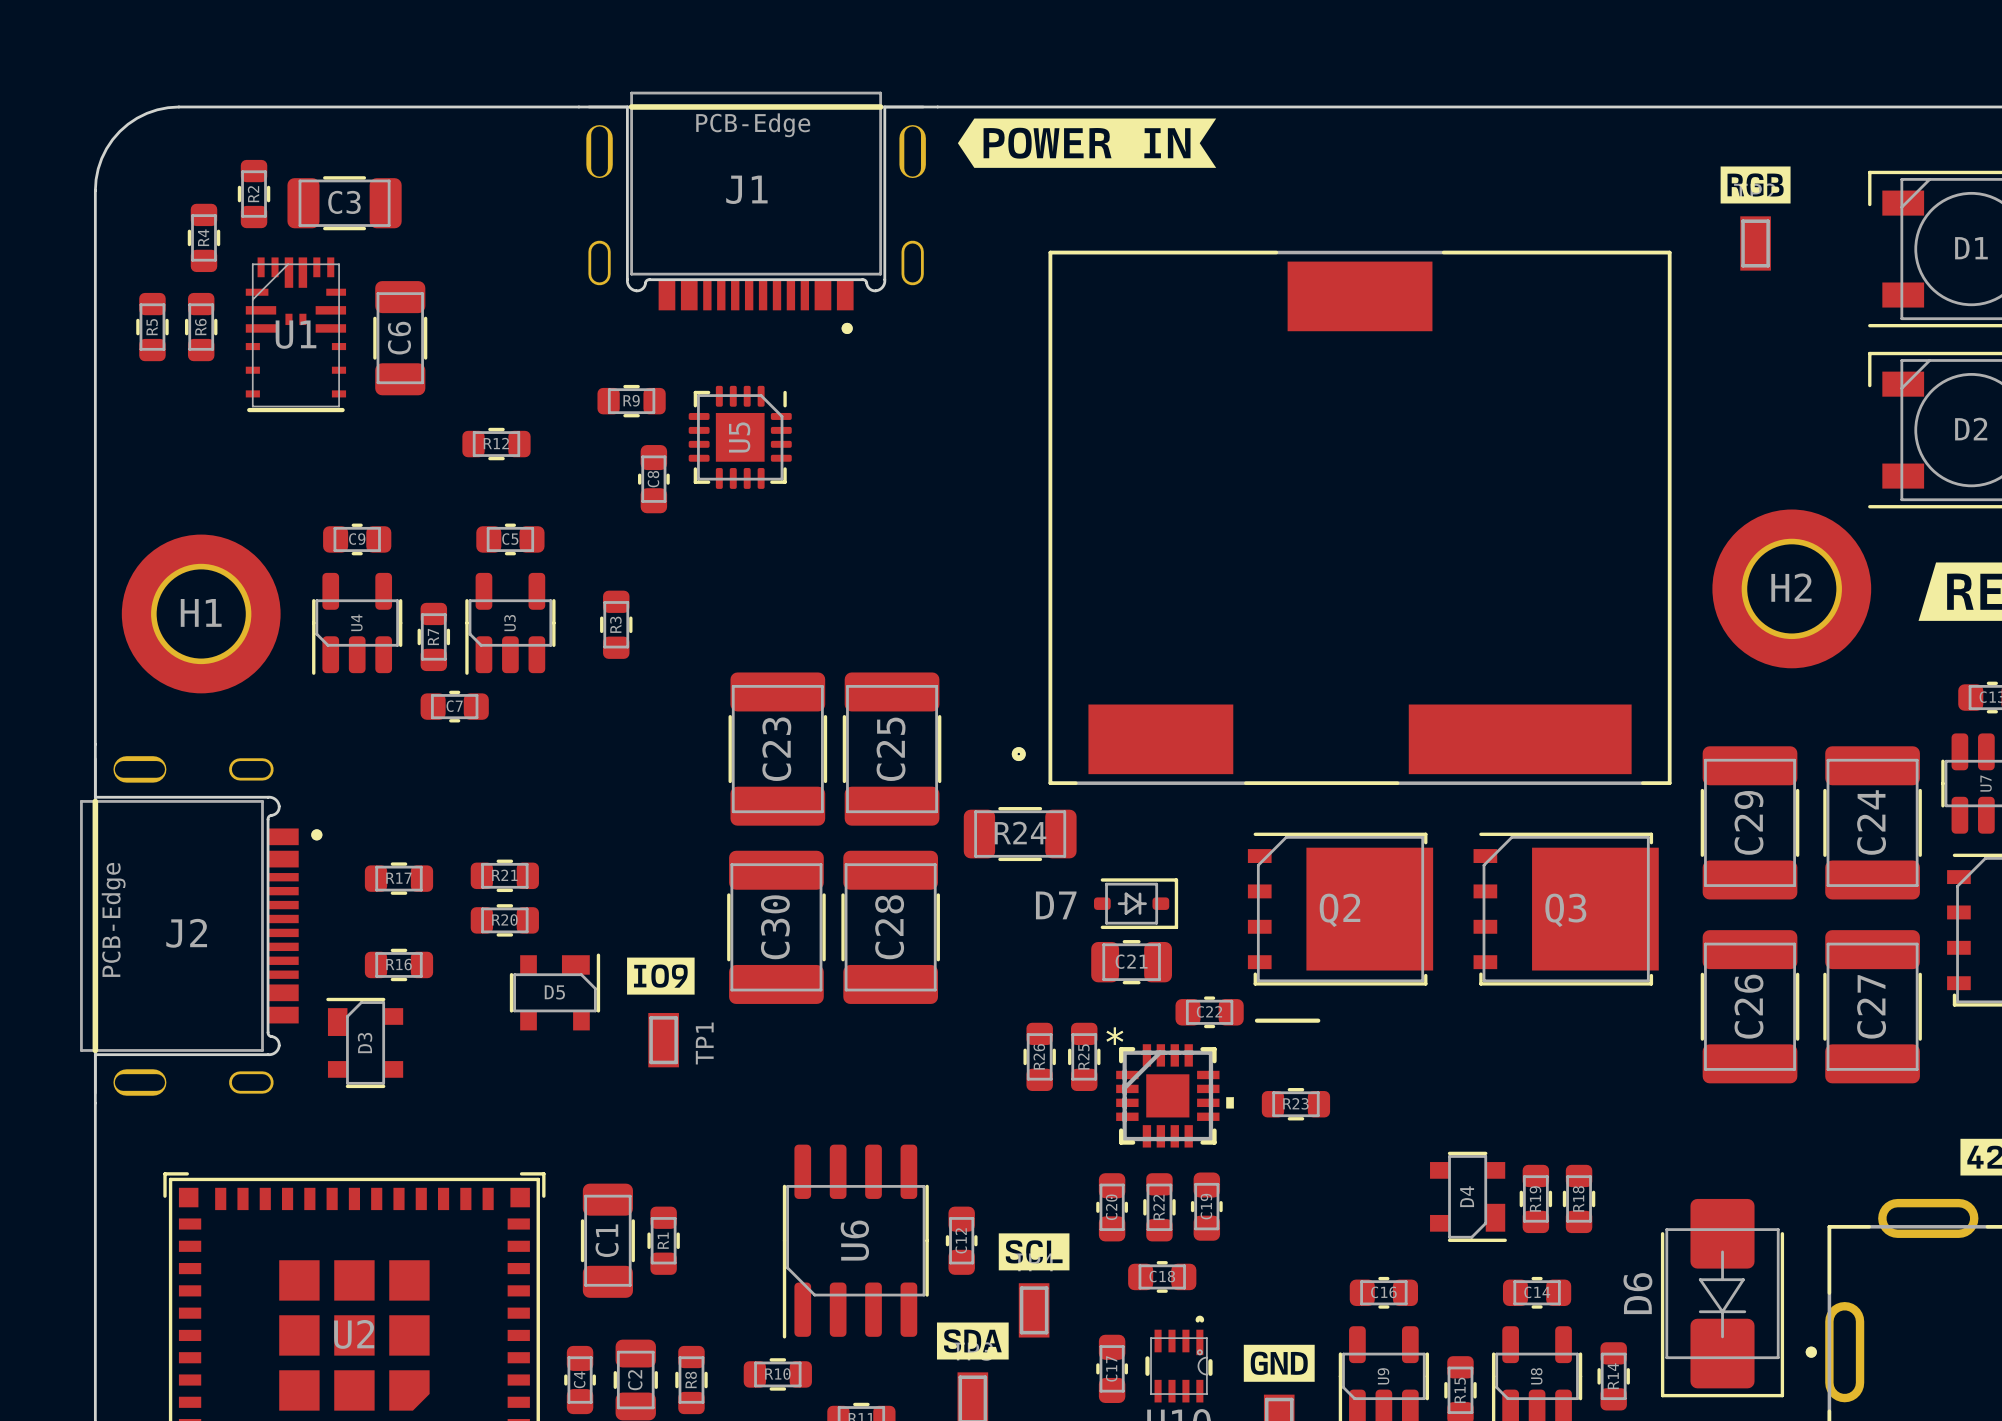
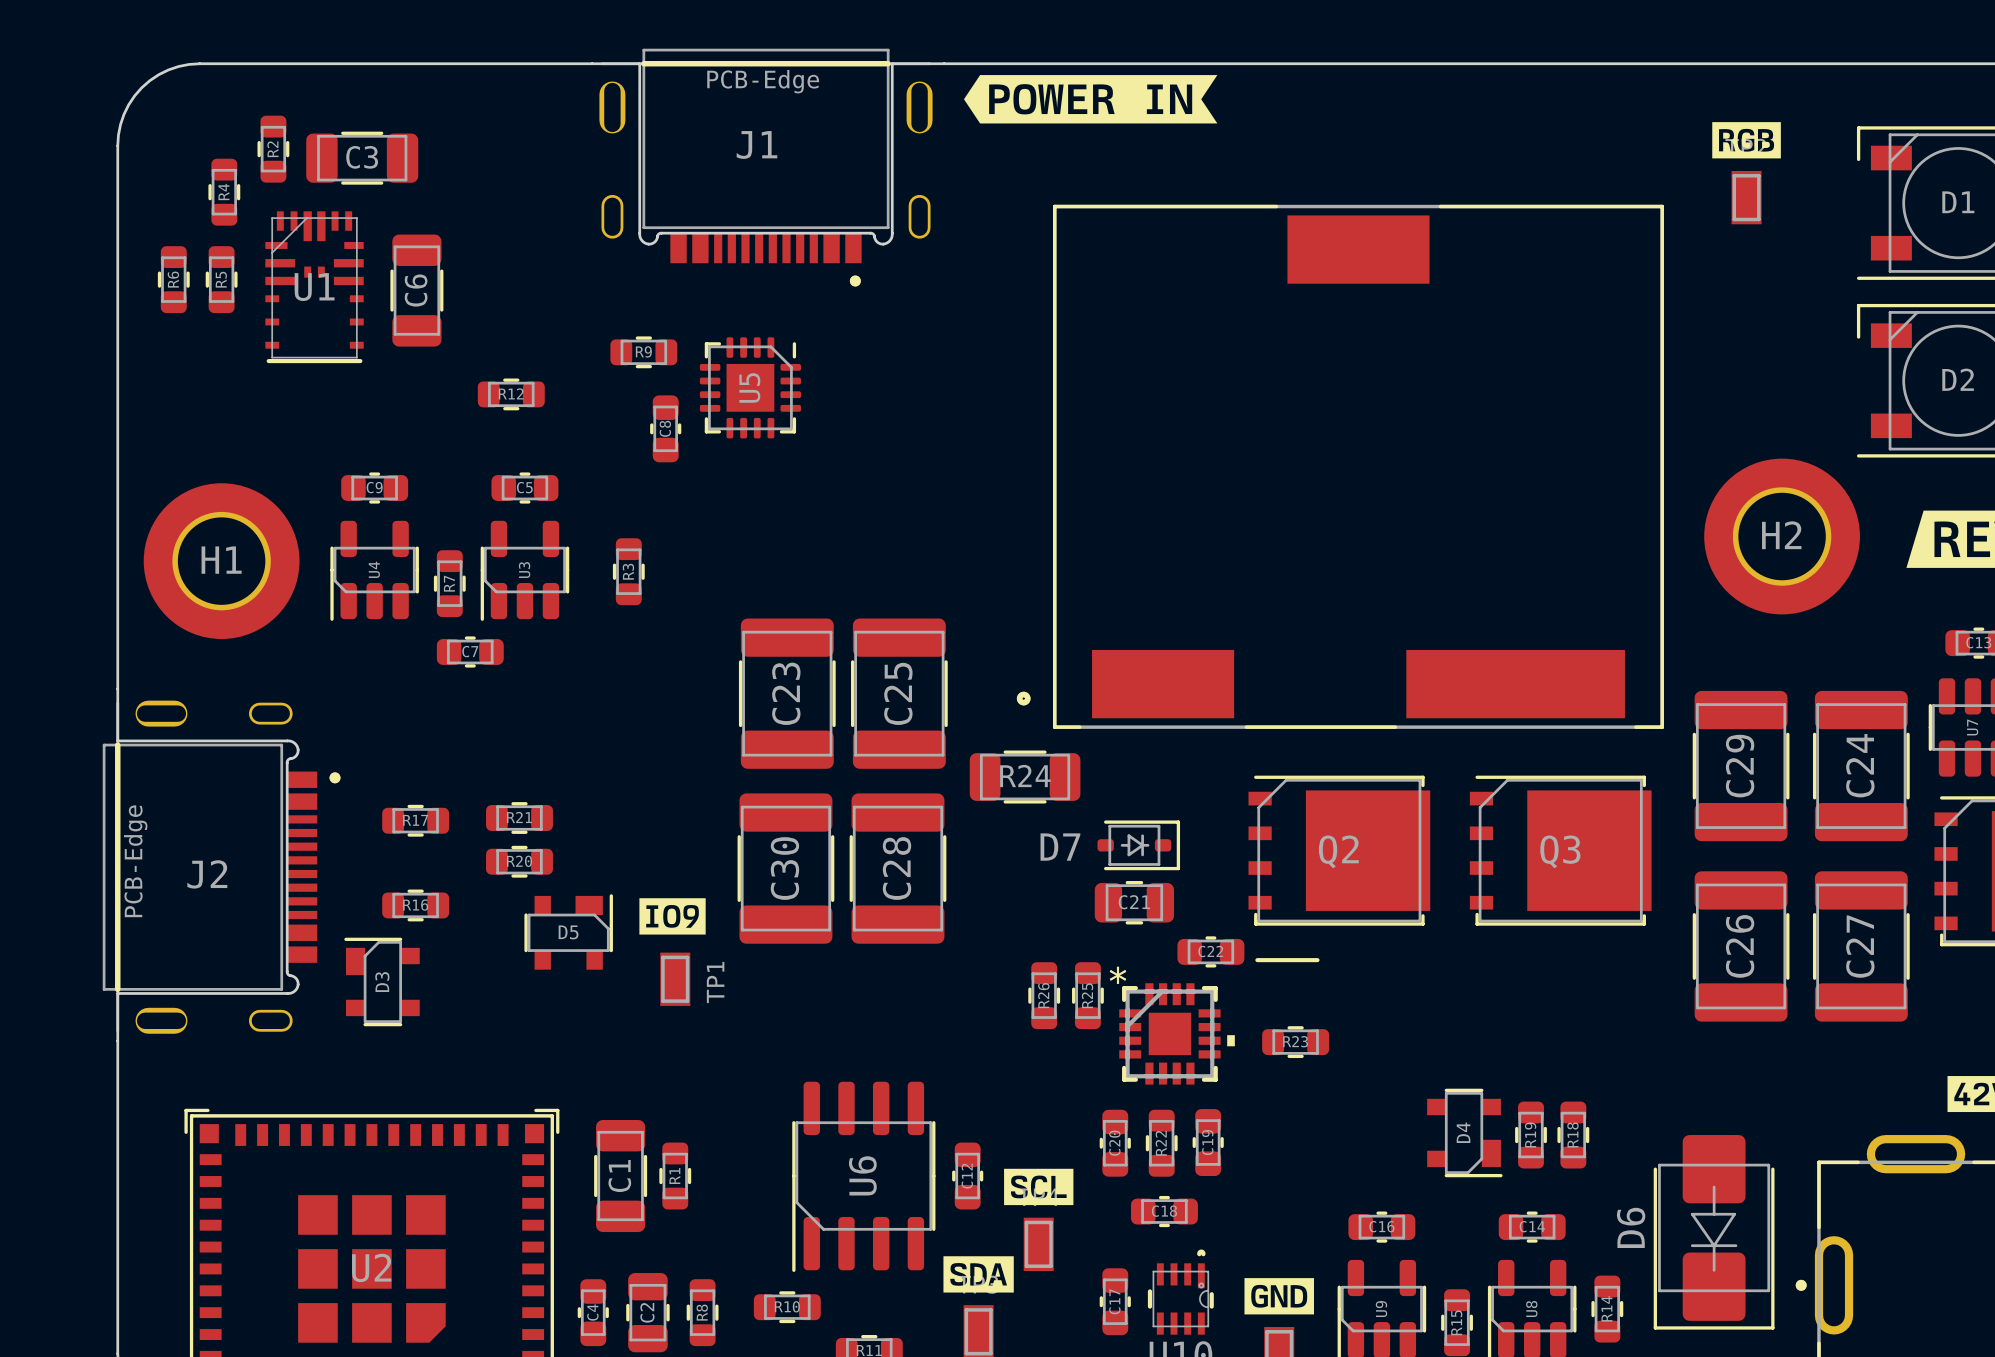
R5 name: R5 (152, 327) -> R6 (173, 279)
R6 name: R6 (200, 327) -> R5 (221, 279)

